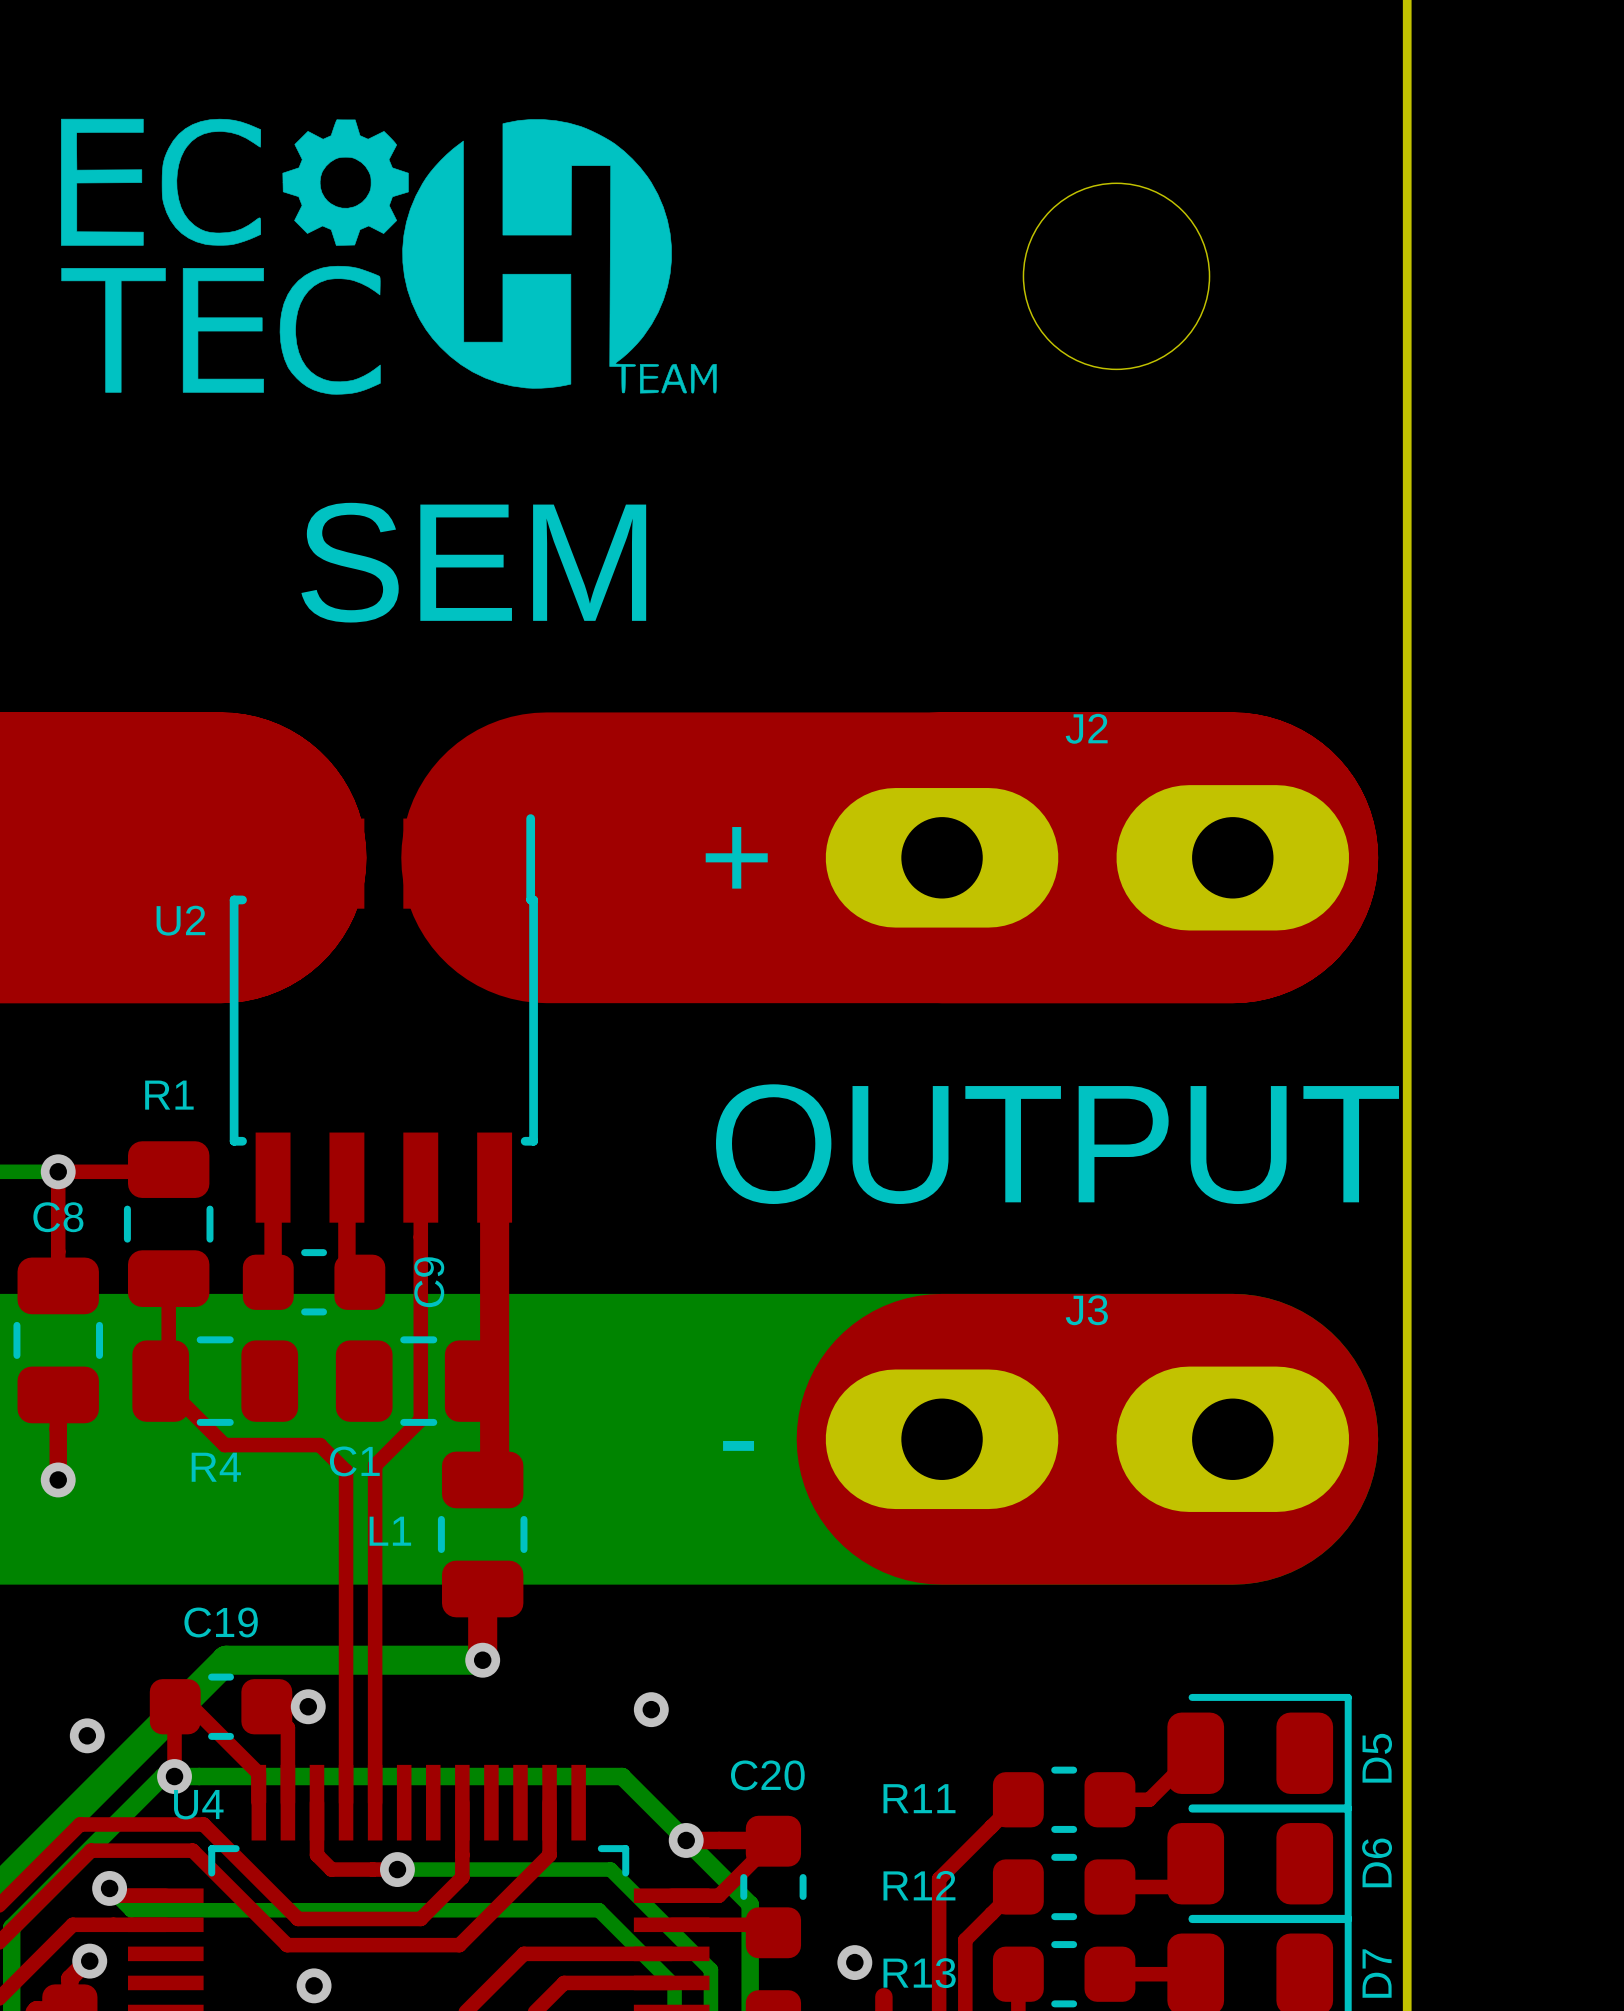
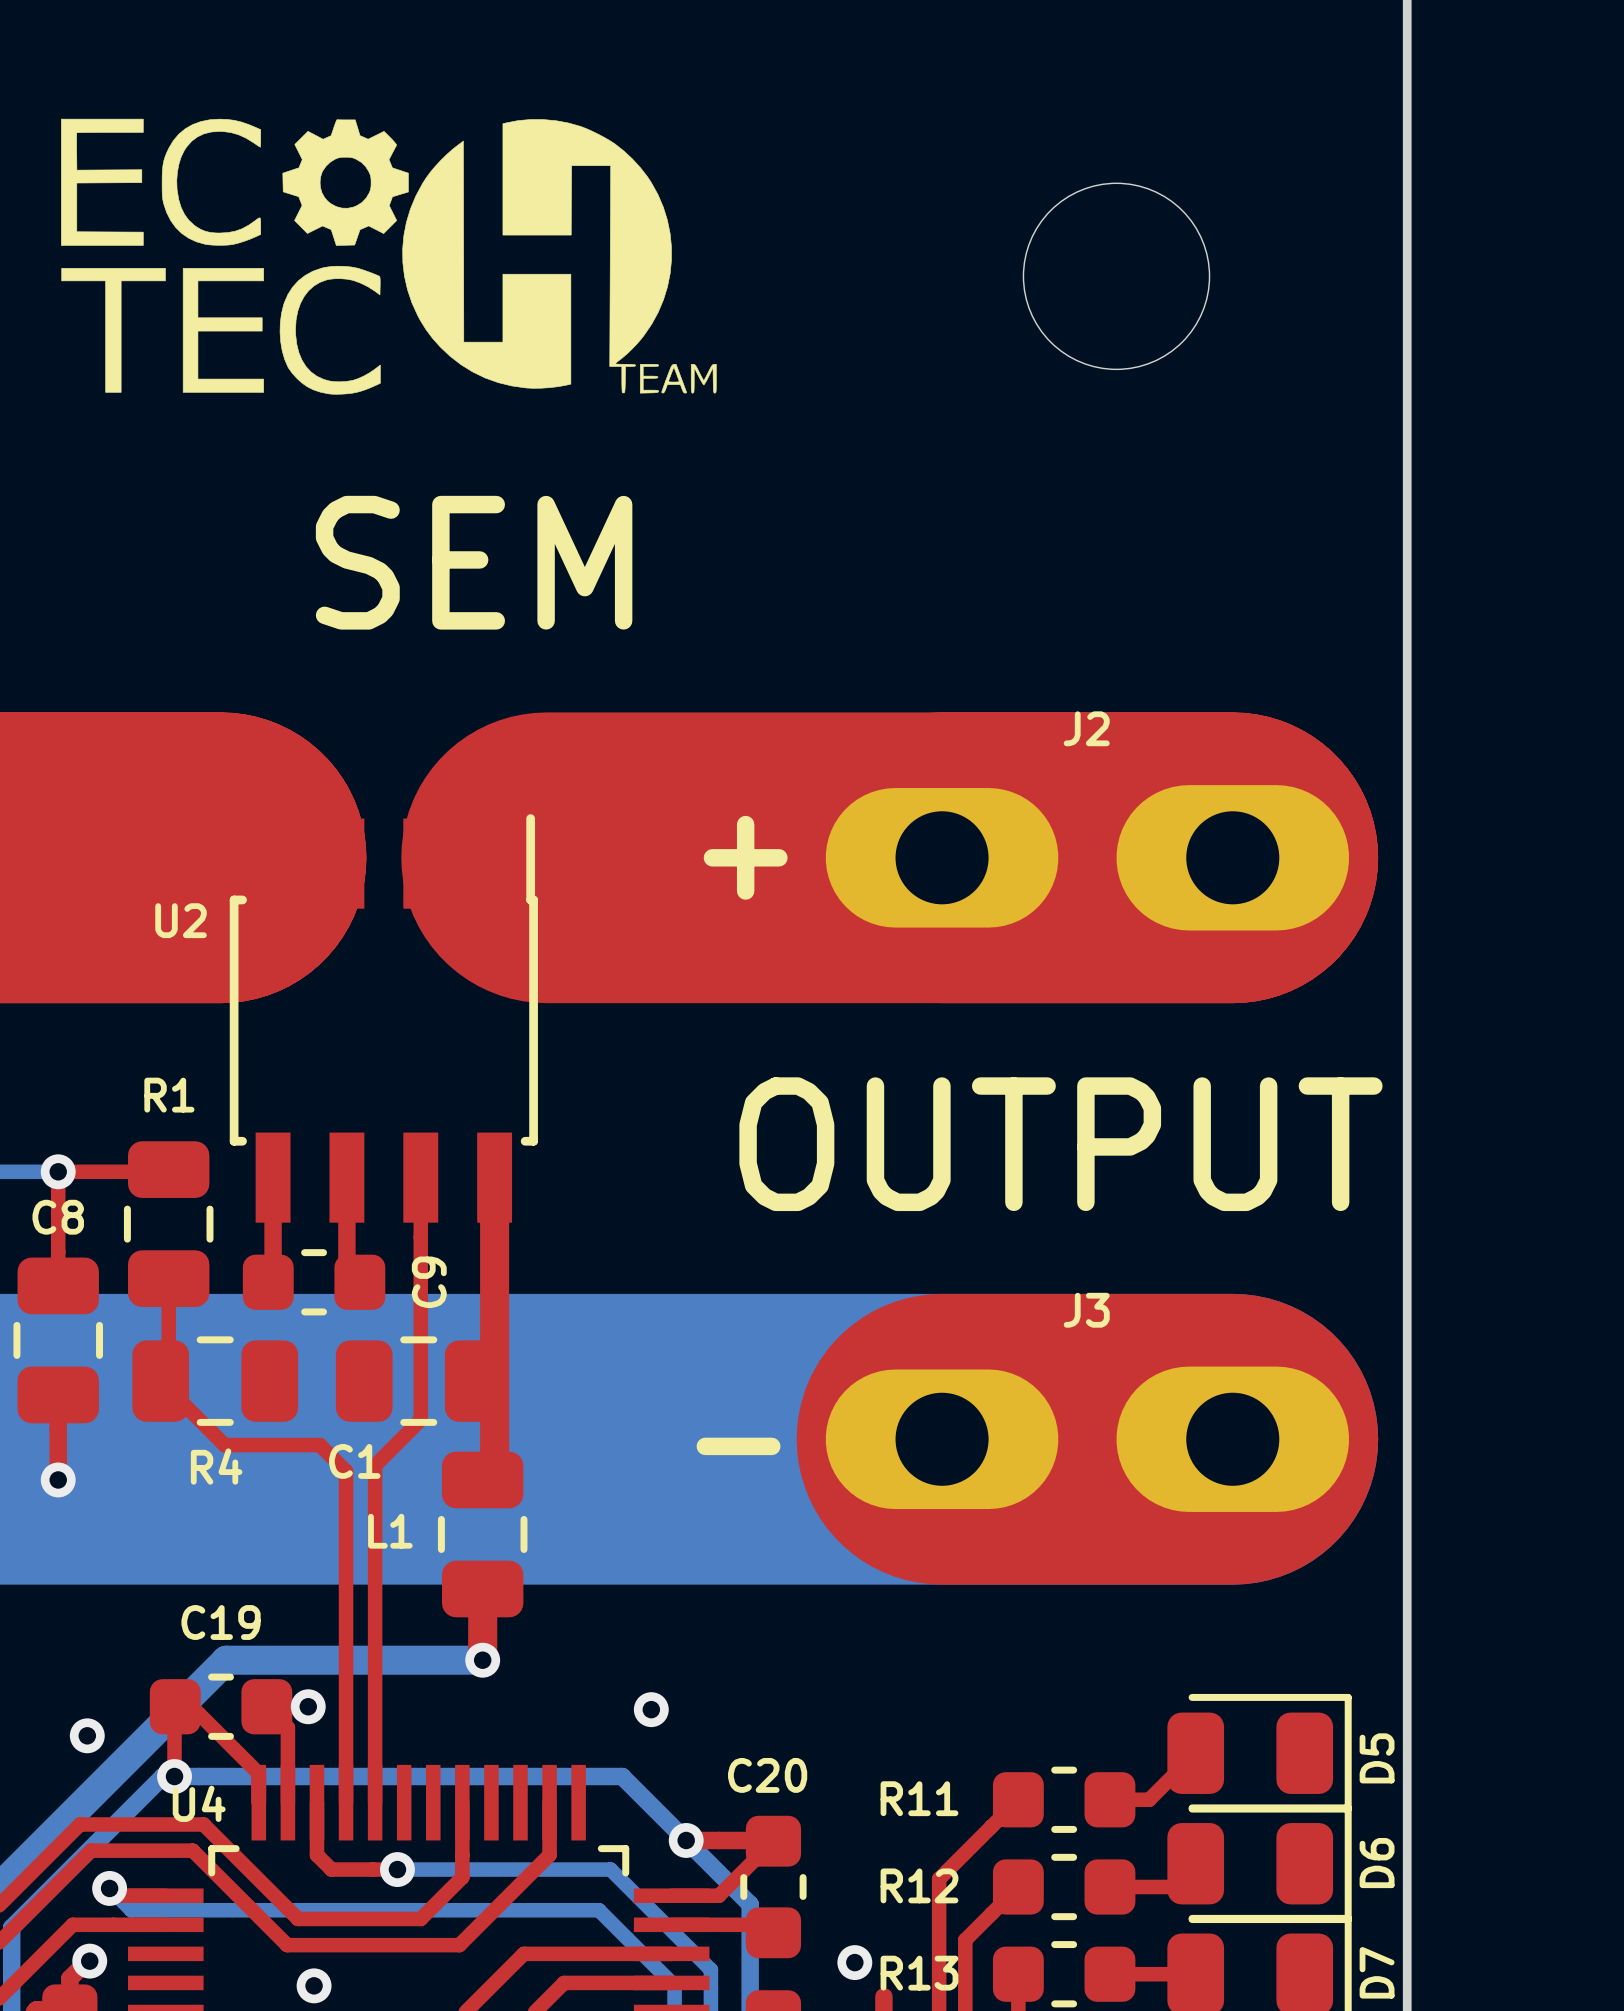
J2 footprint: [825, 785, 1350, 931] -> [825, 785, 1350, 931]
J3 footprint: [825, 1366, 1350, 1512] -> [825, 1366, 1350, 1512]

